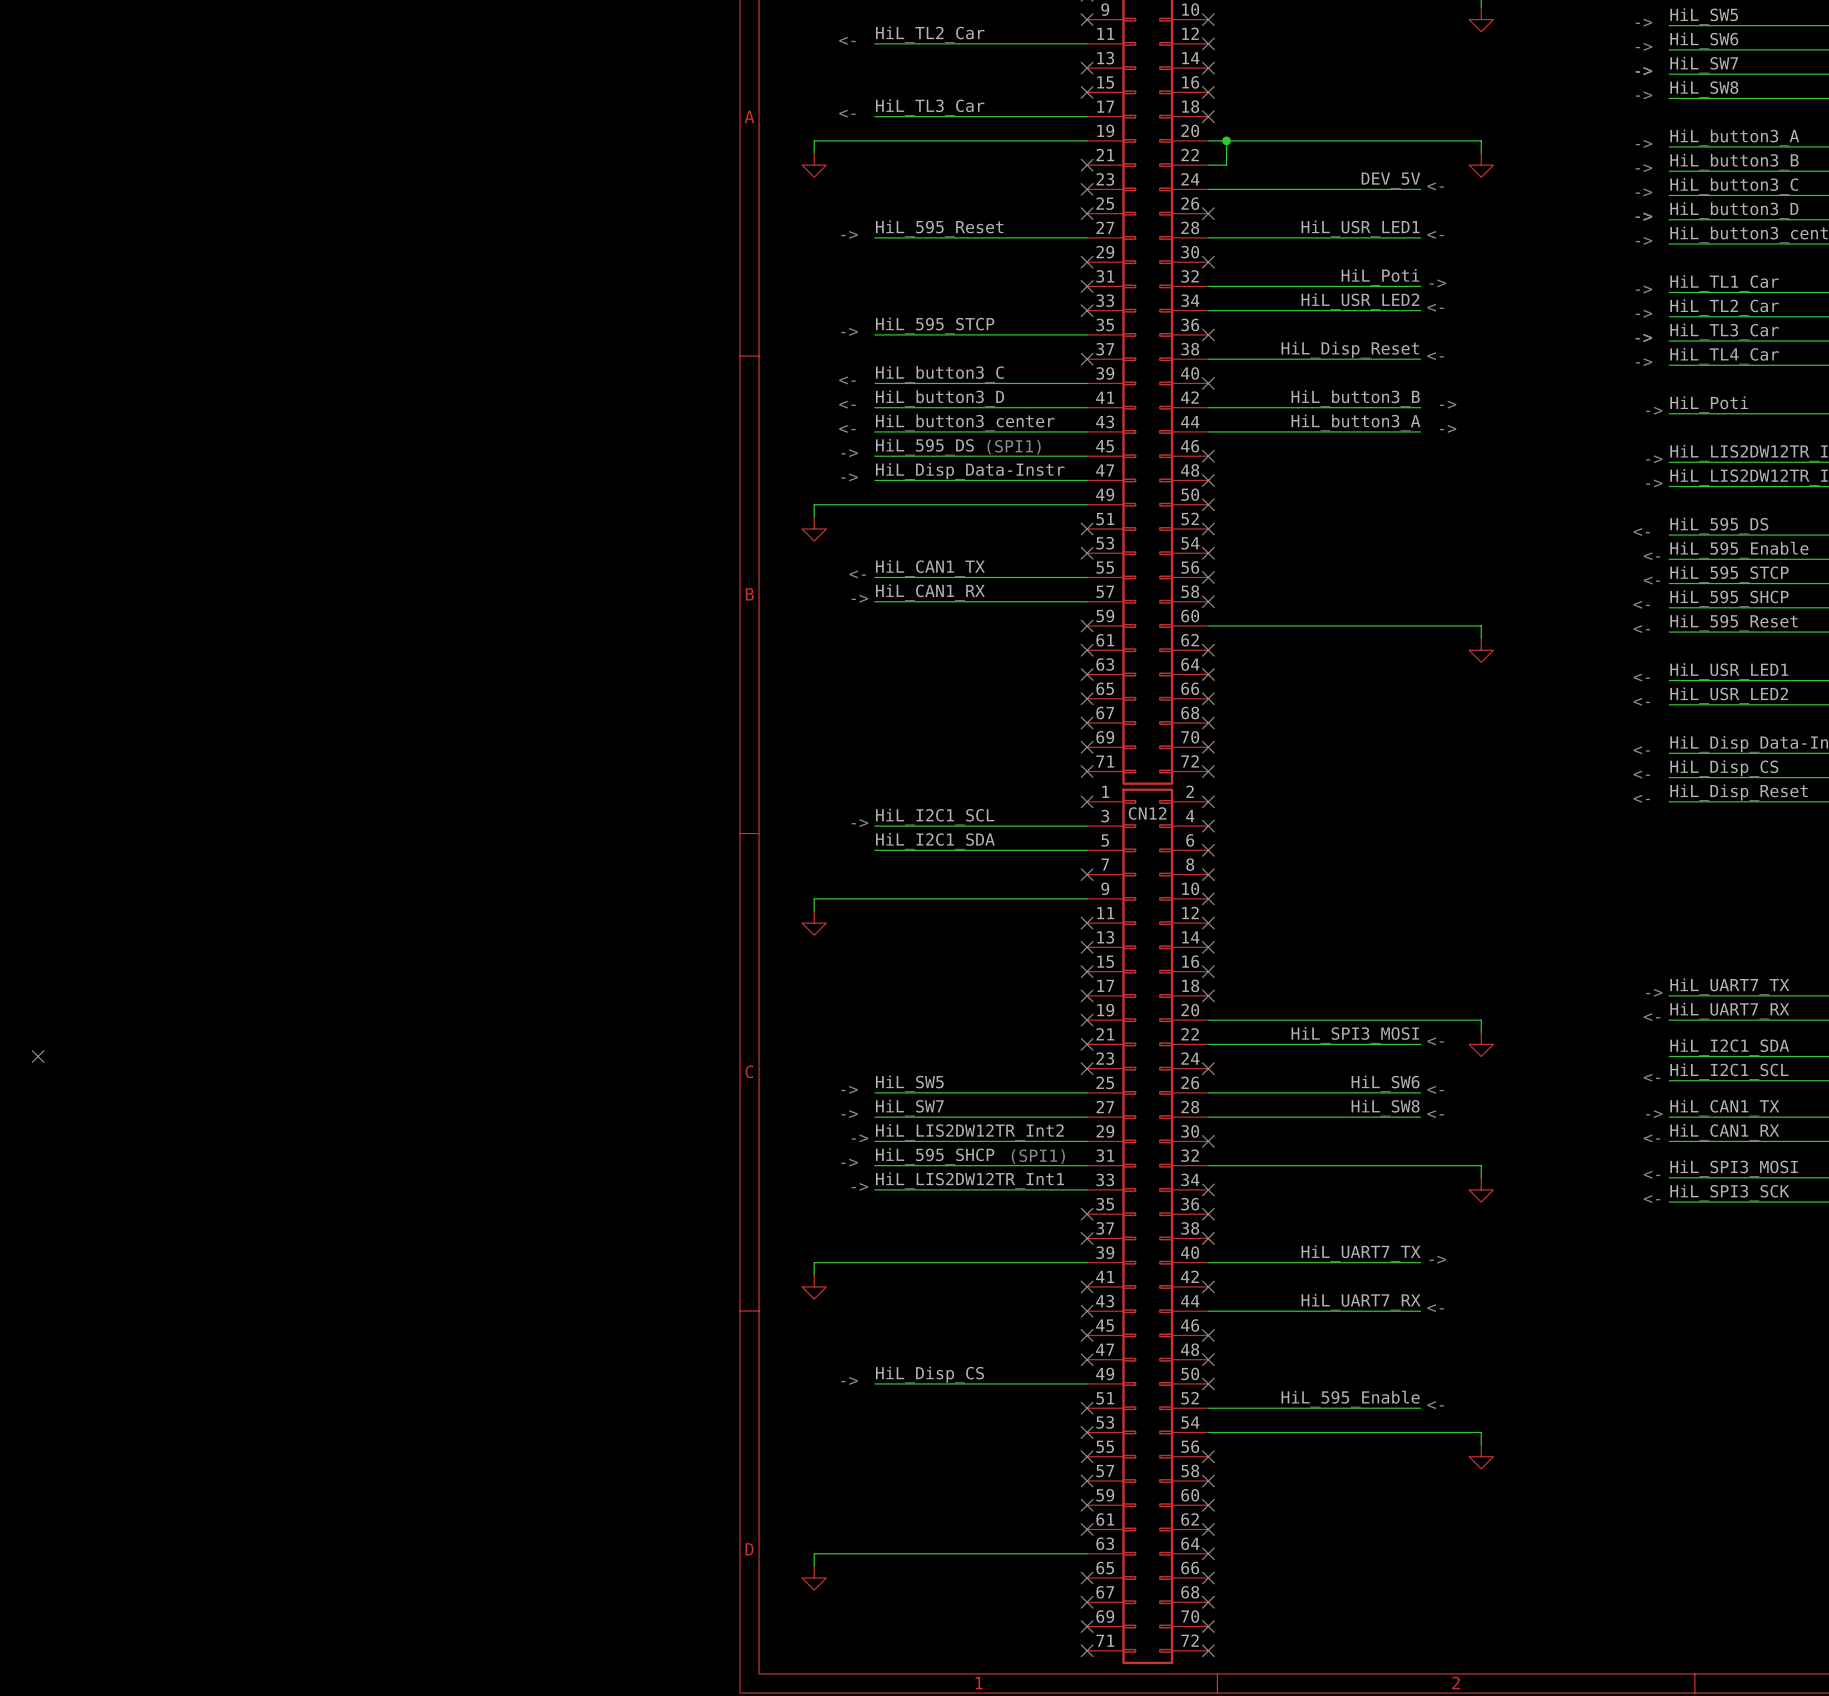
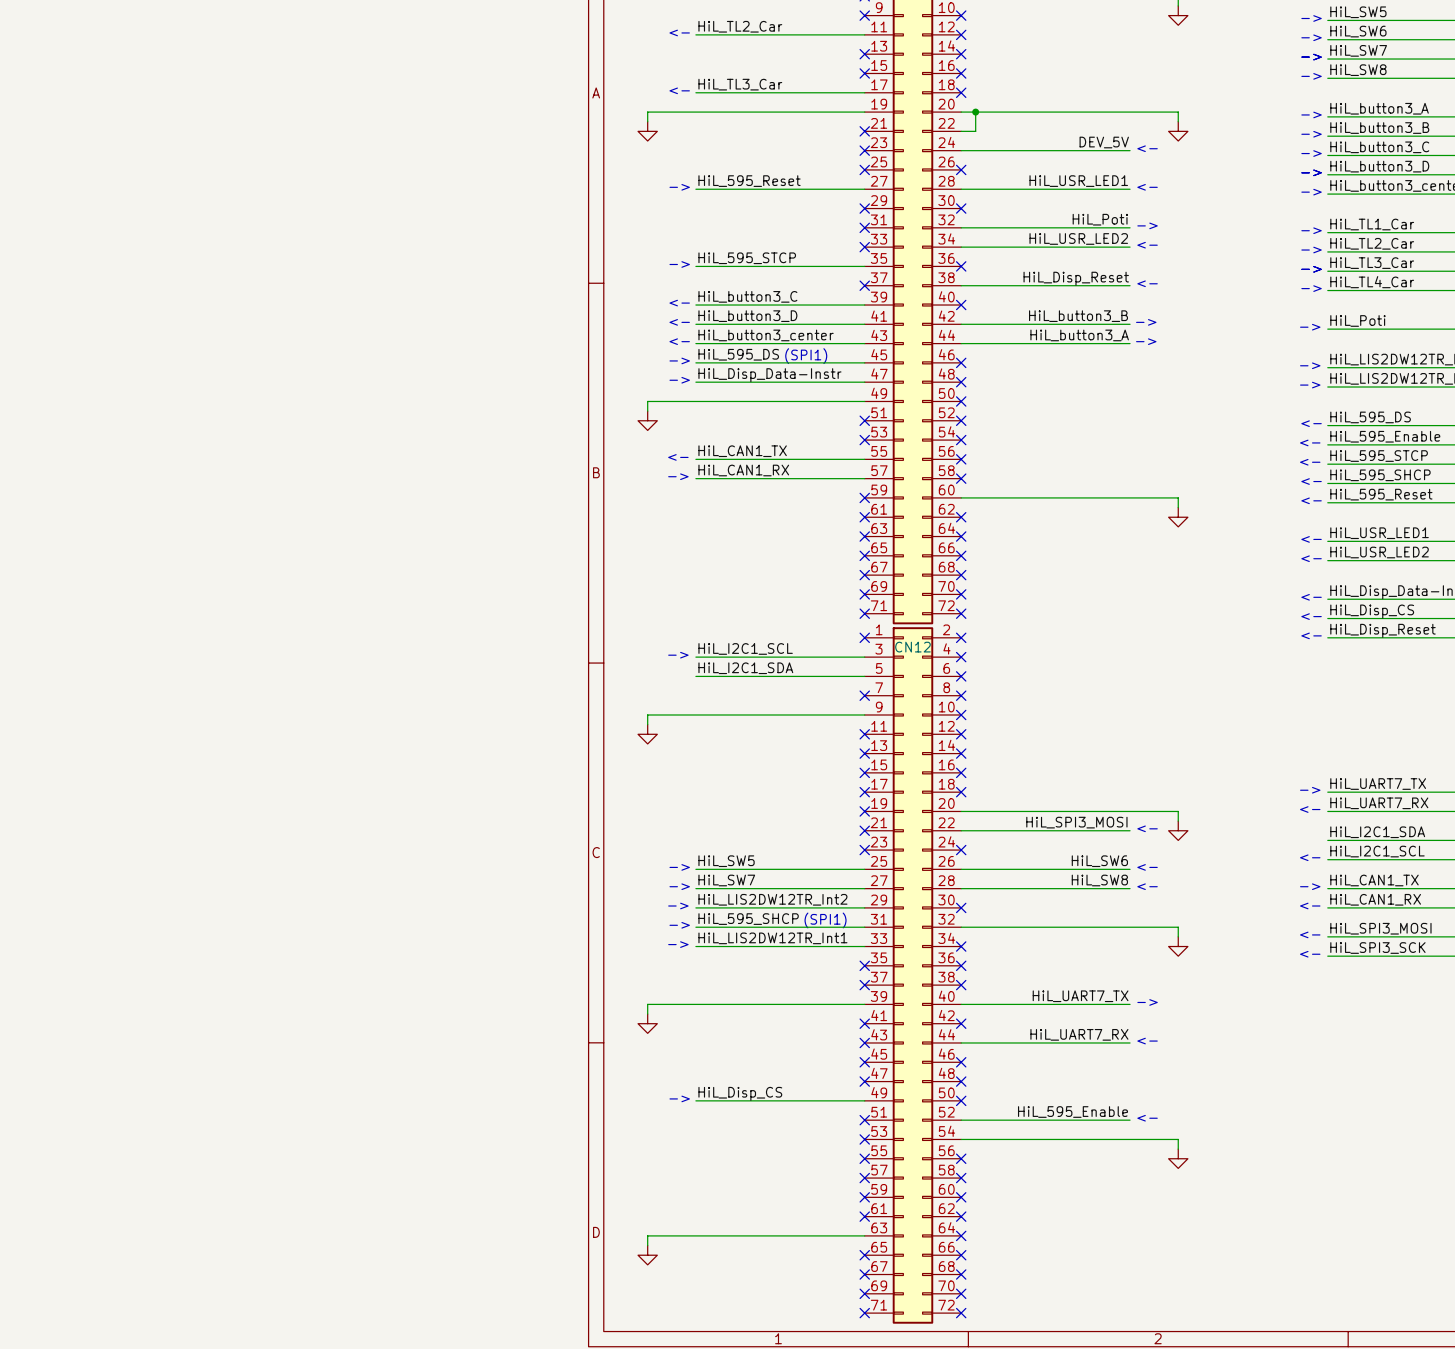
no-connect mark: (38, 1056) -> none

